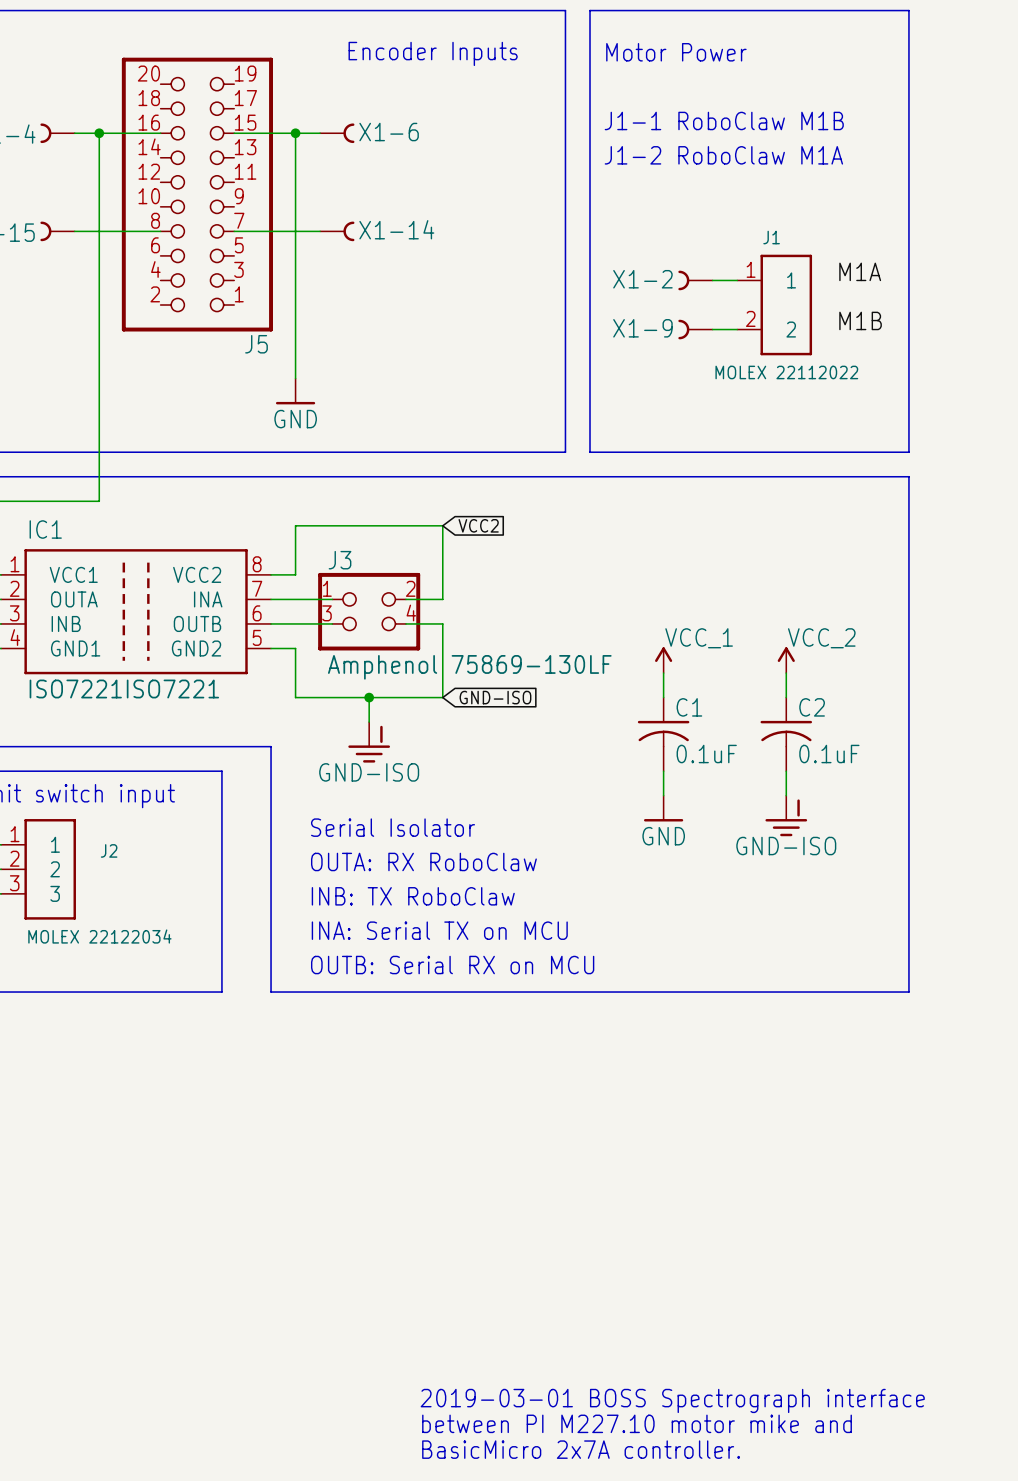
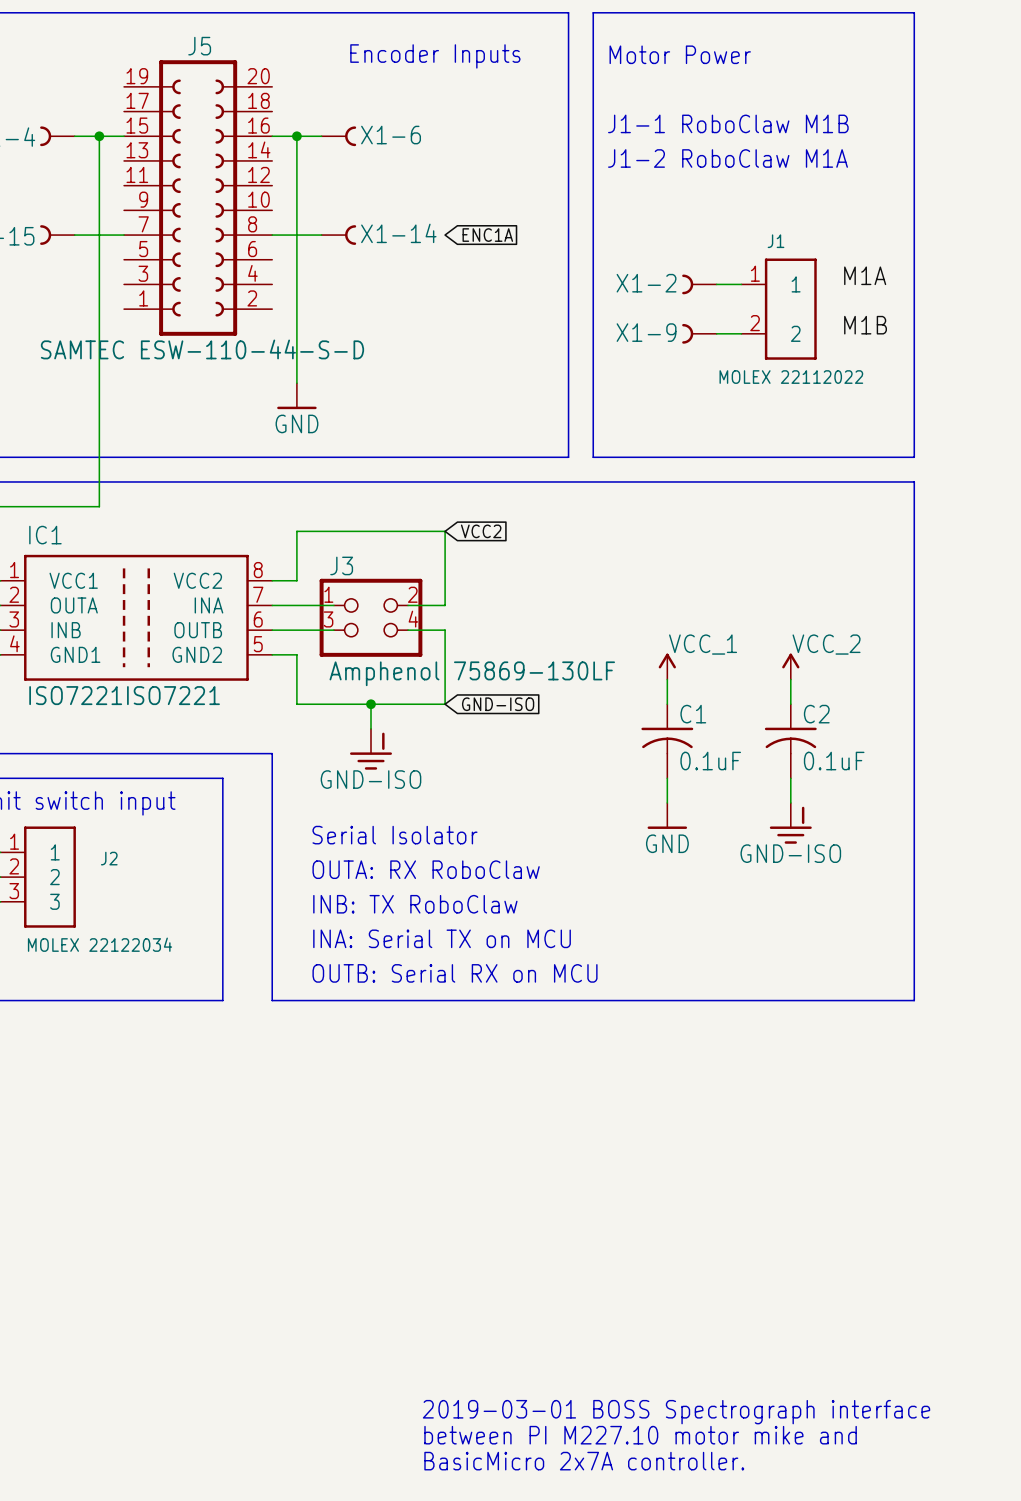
J5 symbol: [121, 57, 273, 332] -> [124, 60, 273, 336]
global label: none -> ENC1A (487, 235)
J5 name position: J5 (256, 344) -> J5 (199, 46)
J5 value: none -> SAMTEC ESW-110-44-S-D (202, 349)

